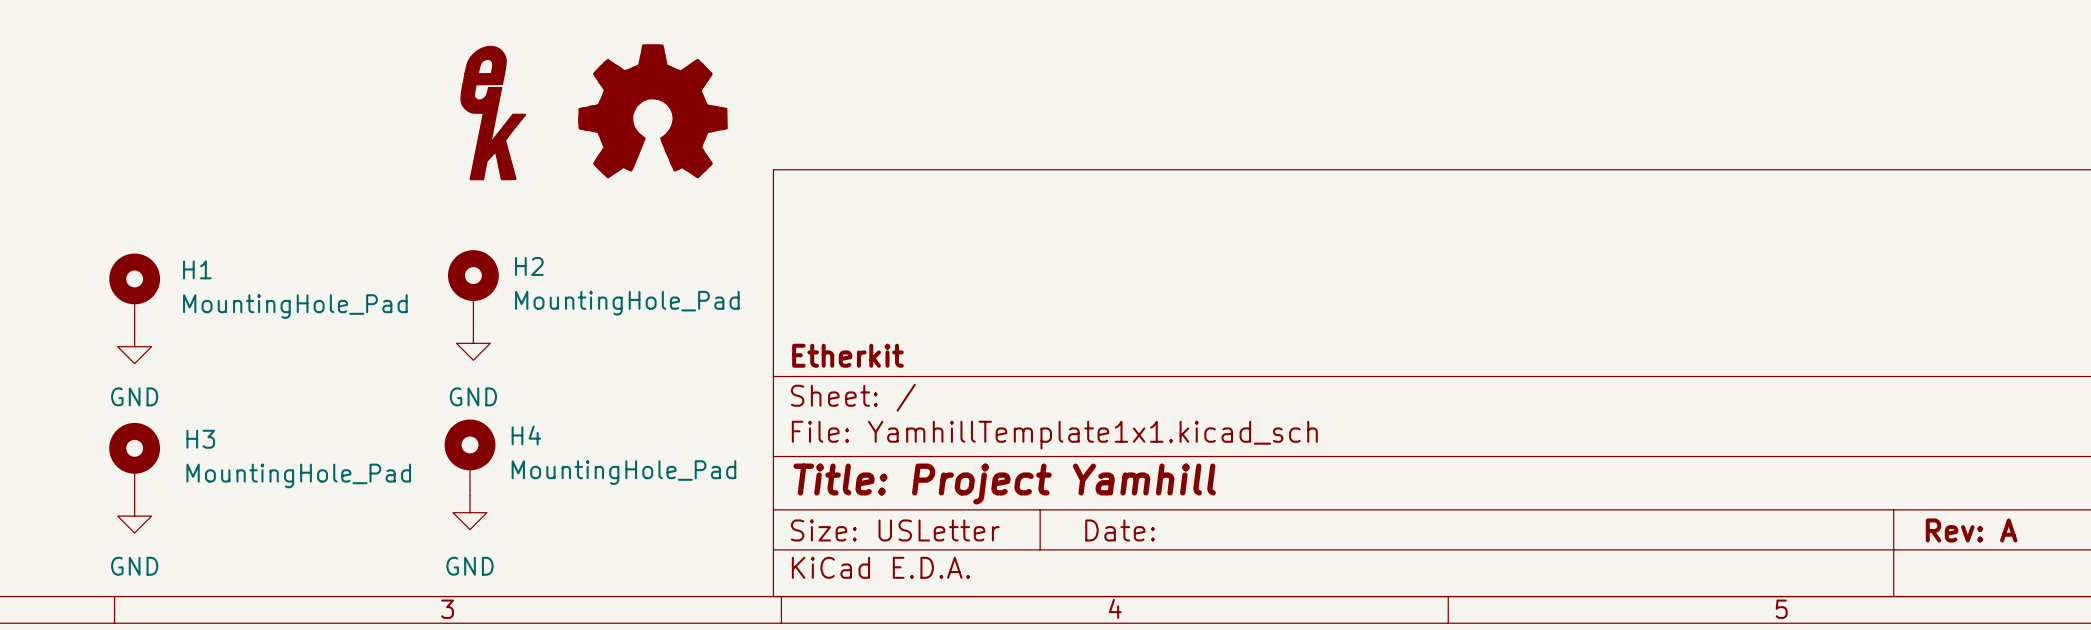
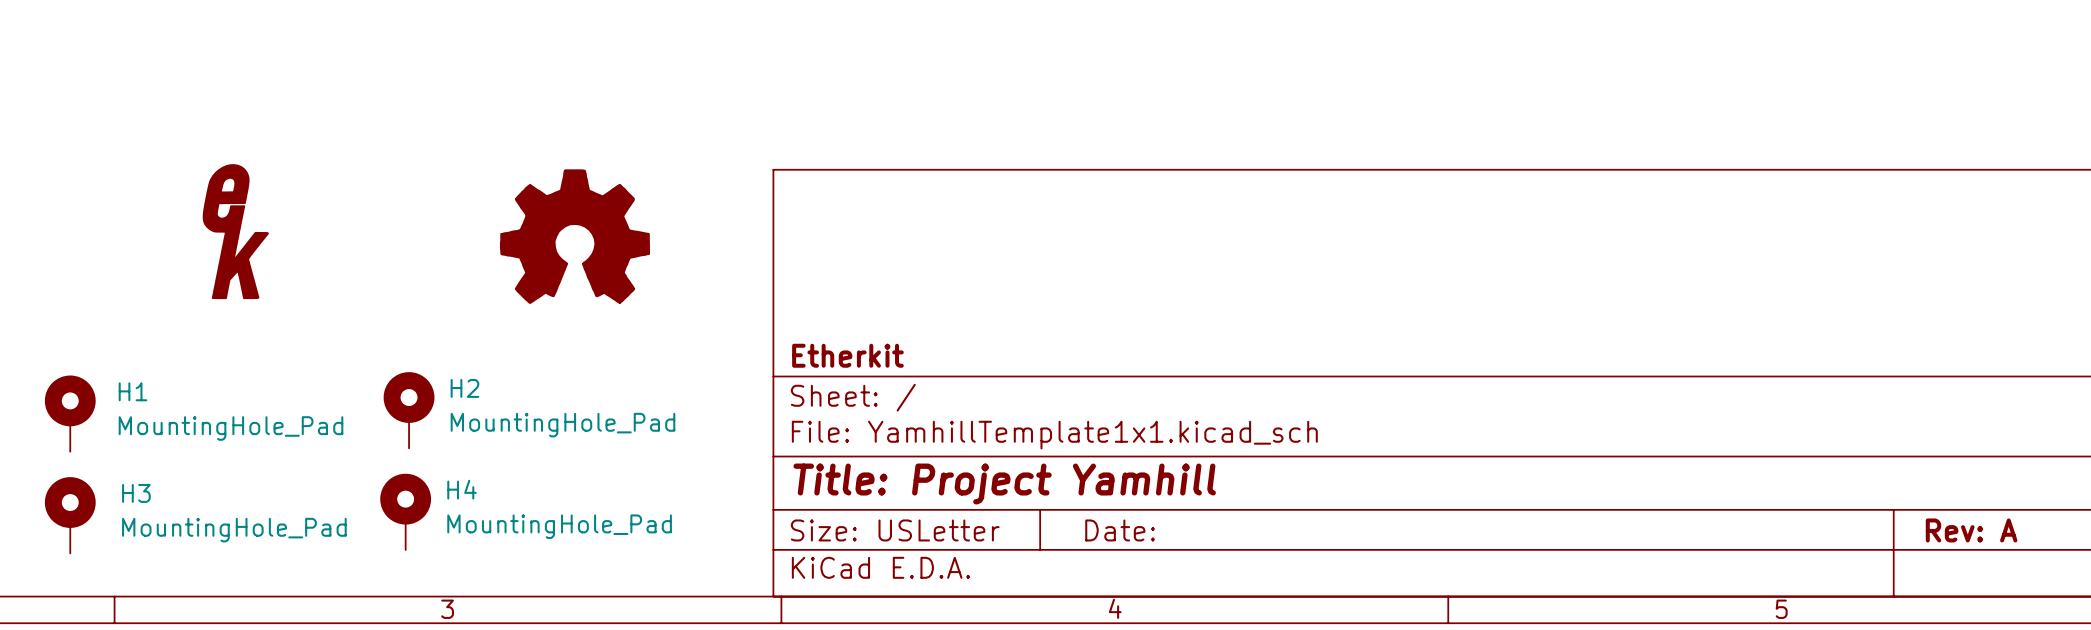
power symbol position: (652, 111) -> (575, 236)
power symbol position: (493, 113) -> (235, 231)
H2 position: (473, 288) -> (409, 410)
H1 position: (134, 291) -> (70, 413)
power symbol: GND (473, 343) -> none
power symbol: GND (134, 346) -> none
H4 position: (470, 457) -> (405, 511)
H3 position: (134, 461) -> (70, 515)
power symbol: GND (470, 512) -> none
power symbol: GND (134, 516) -> none

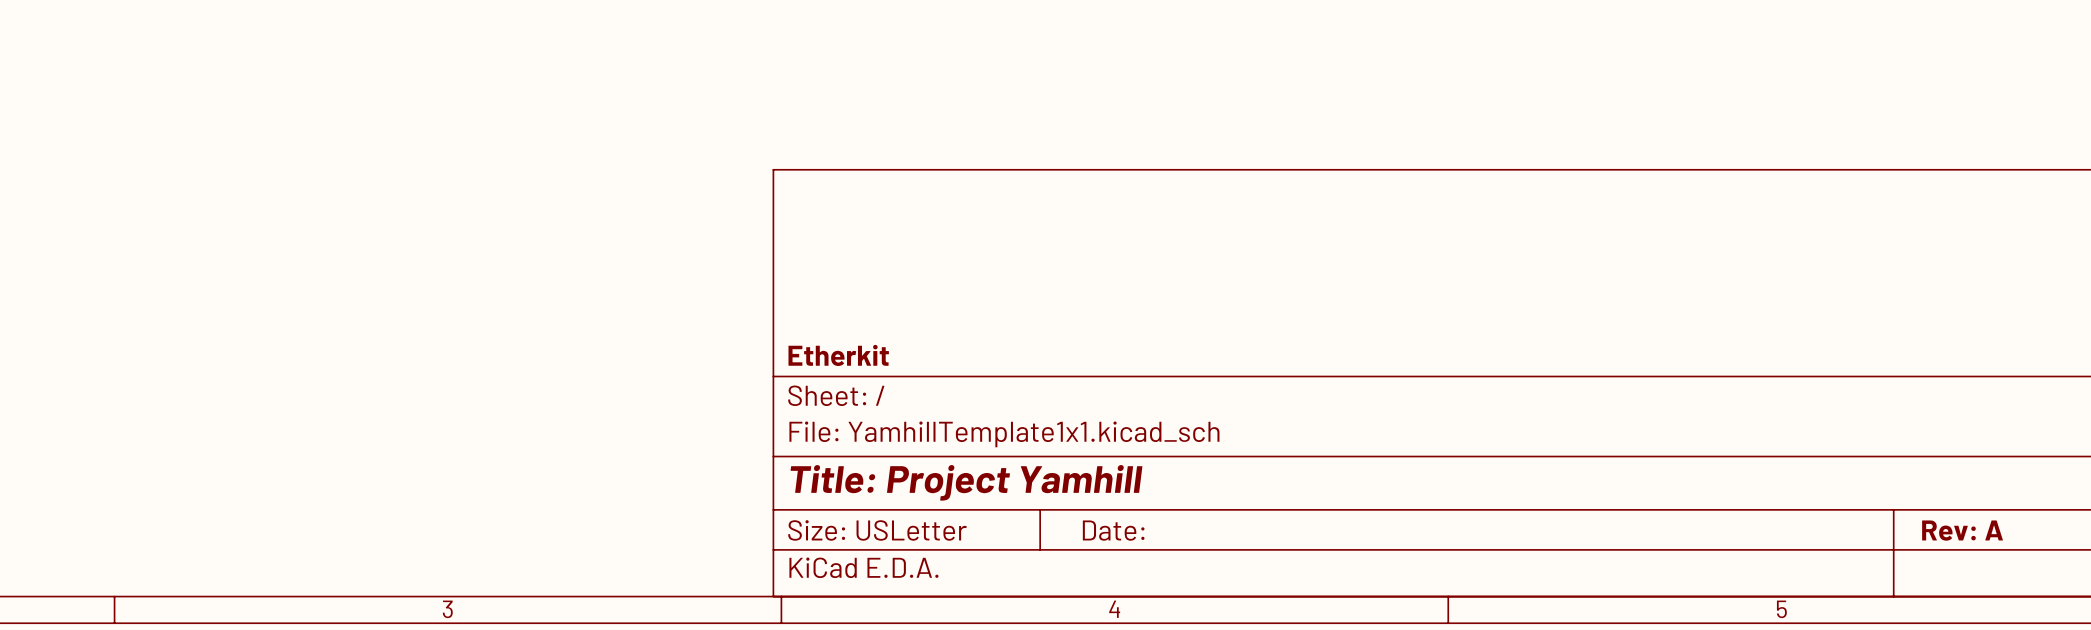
power symbol: (235, 231) -> none
power symbol: (575, 236) -> none
H2: MountingHole_Pad (409, 410) -> none
H1: MountingHole_Pad (70, 413) -> none
H4: MountingHole_Pad (405, 511) -> none
H3: MountingHole_Pad (70, 515) -> none

